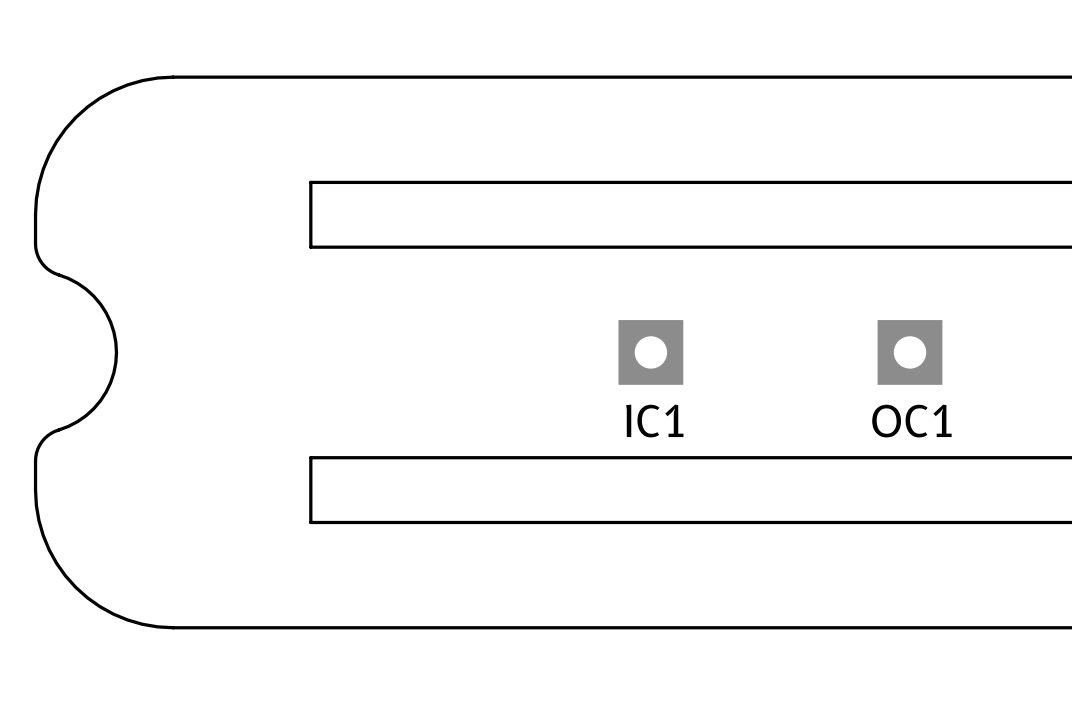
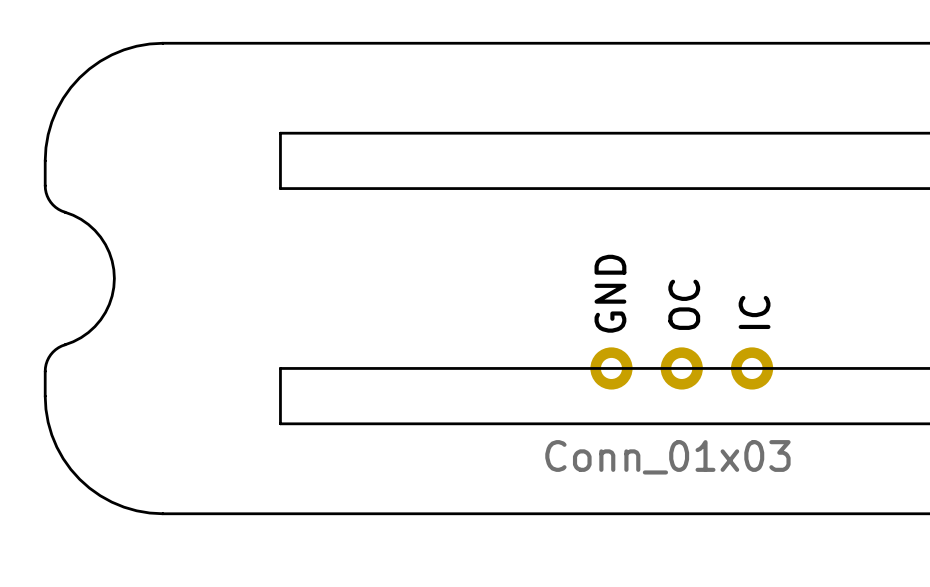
IC1: (650, 352) -> none
OC1: (910, 352) -> none
part: none -> Conn_01x03 (681, 368)

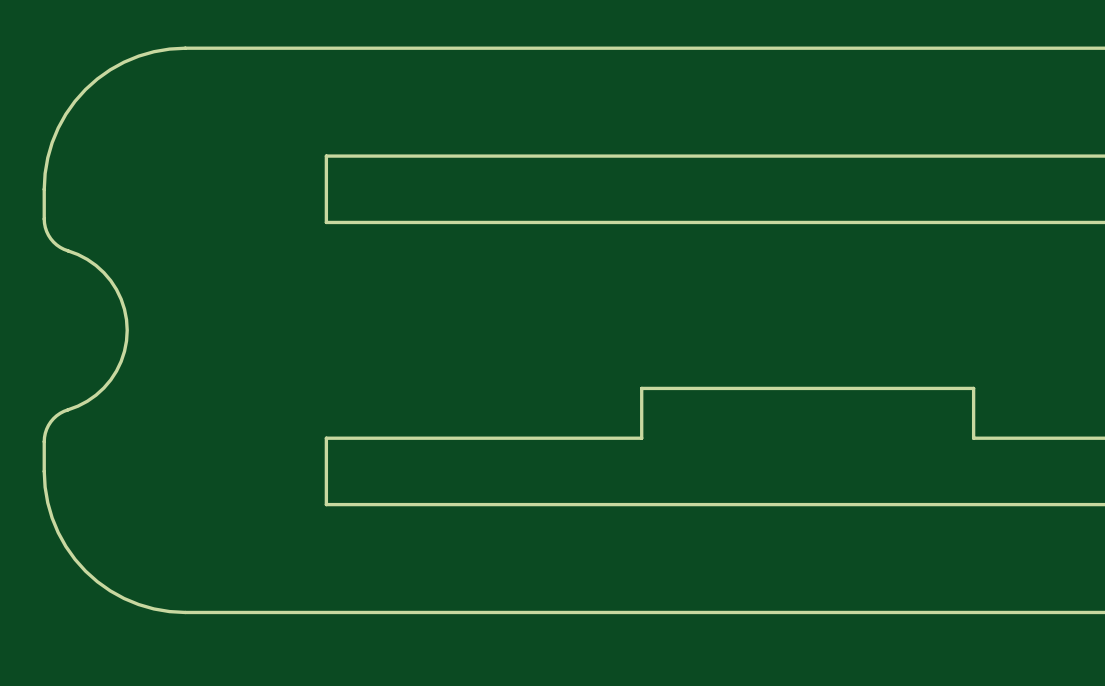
board edge: (543, 368) (820, 368) -> (641, 438) (641, 388) (973, 388) (973, 438)
part: Conn_01x03 (681, 368) -> none

